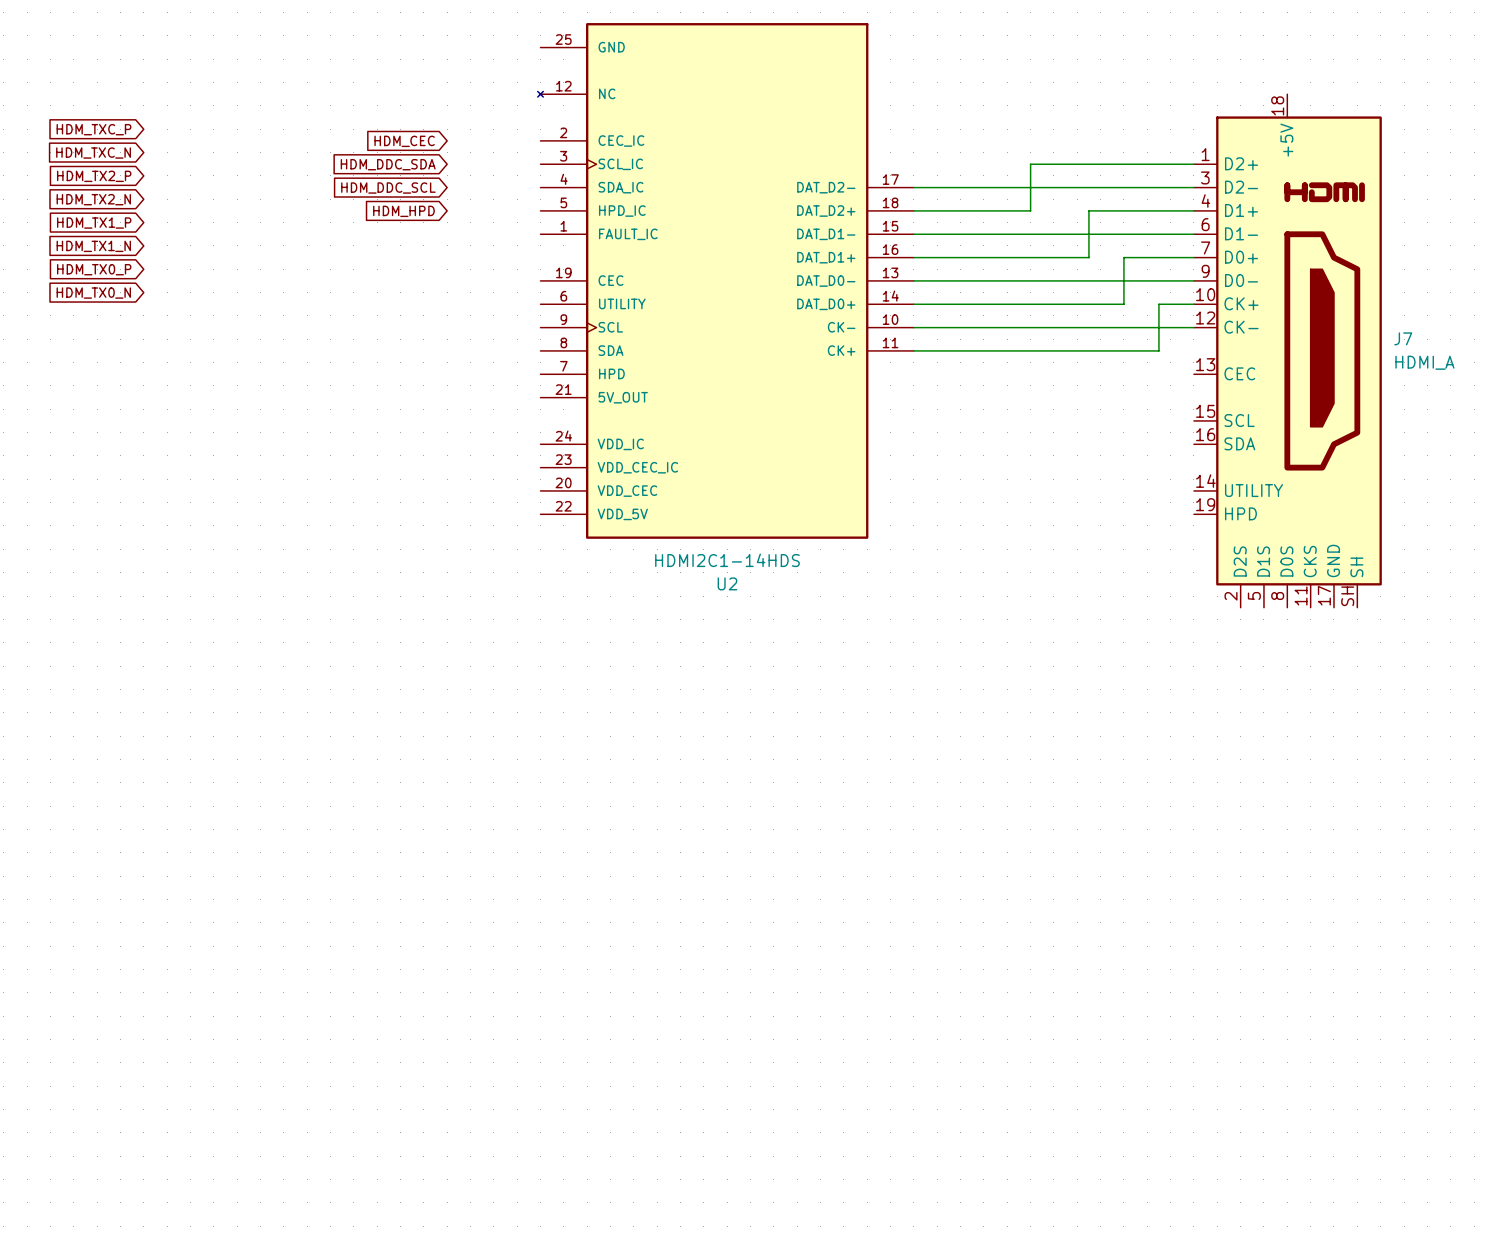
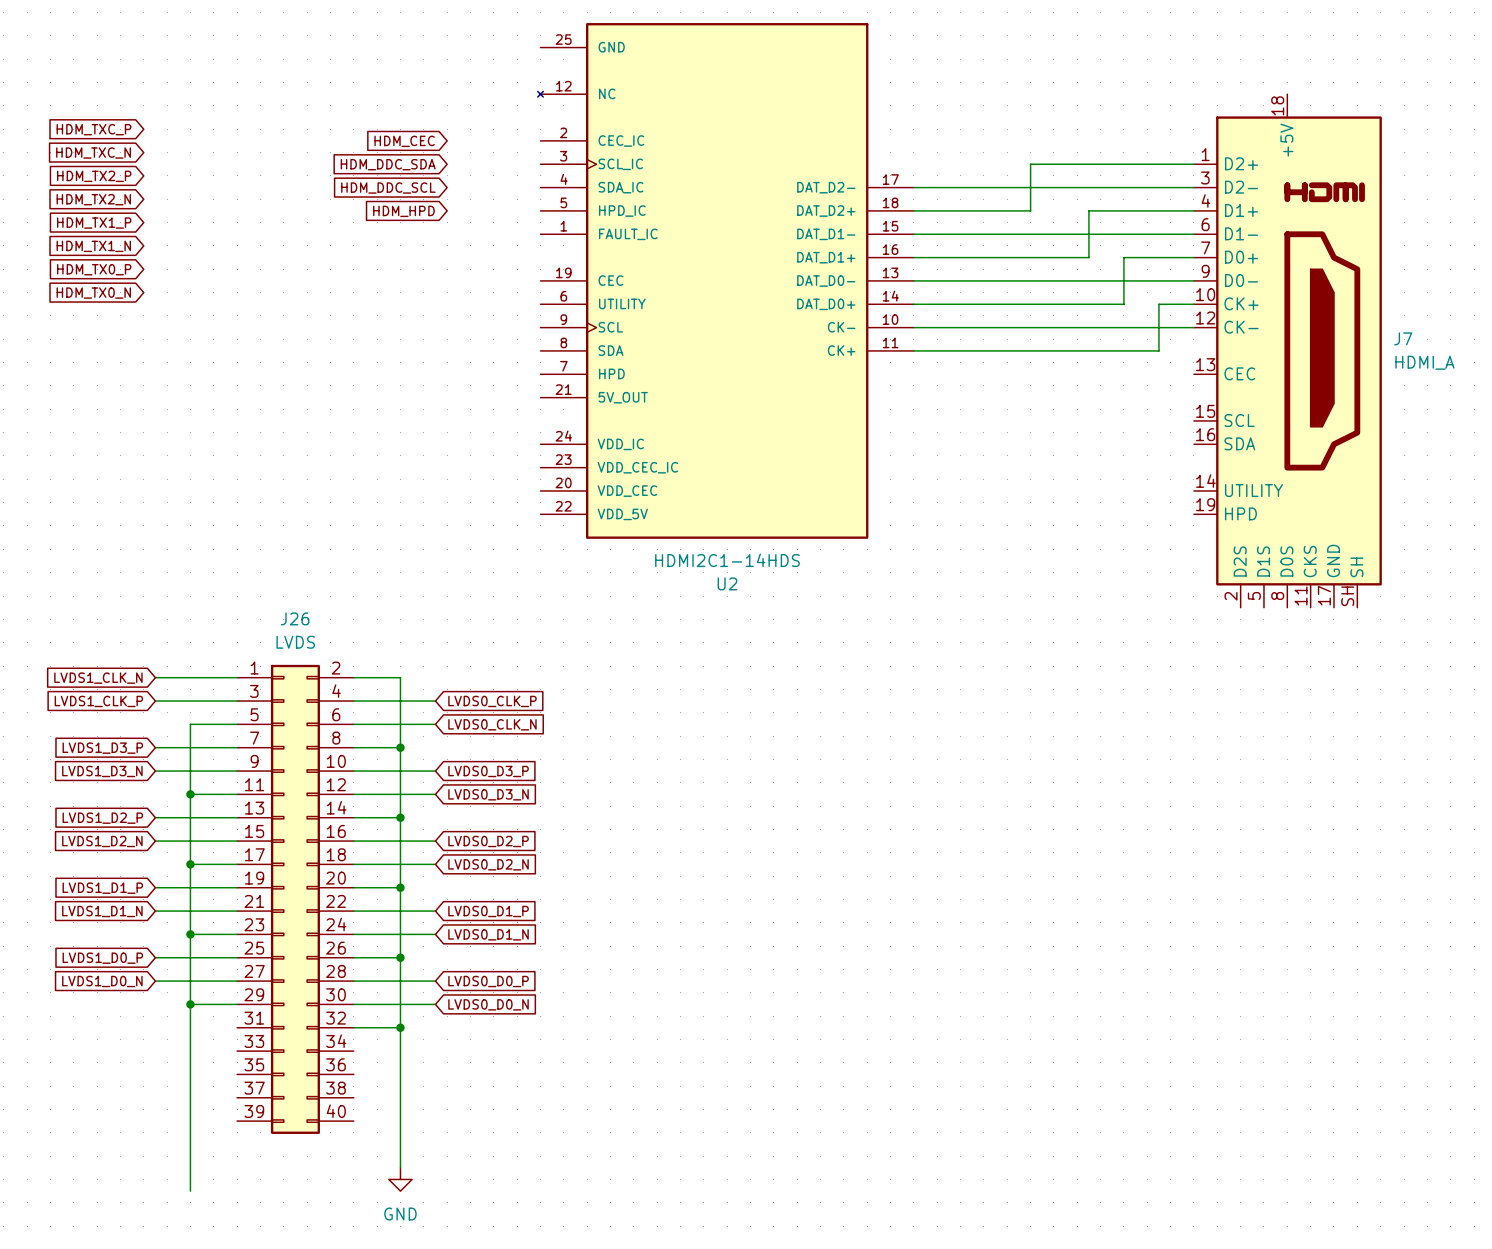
wire: none -> (155, 677) (237, 677)
wire: none -> (353, 677) (400, 677) (400, 1167)
global label: none -> LVDS1_CLK_N (98, 678)
global label: none -> LVDS1_CLK_P (98, 701)
wire: none -> (155, 701) (237, 701)
wire: none -> (353, 701) (435, 701)
global label: none -> LVDS0_CLK_P (492, 701)
wire: none -> (237, 724) (190, 724) (190, 1191)
wire: none -> (353, 724) (435, 724)
global label: none -> LVDS0_CLK_N (492, 724)
wire: none -> (155, 747) (237, 747)
wire: none -> (353, 747) (400, 747)
junction: none -> (400, 747)
global label: none -> LVDS1_D3_P (102, 748)
global label: none -> LVDS1_D3_N (102, 771)
wire: none -> (155, 771) (237, 771)
wire: none -> (353, 771) (435, 771)
global label: none -> LVDS0_D3_P (488, 771)
wire: none -> (190, 794) (237, 794)
junction: none -> (190, 794)
wire: none -> (353, 794) (435, 794)
global label: none -> LVDS0_D3_N (488, 794)
wire: none -> (155, 817) (237, 817)
wire: none -> (353, 817) (400, 817)
junction: none -> (400, 817)
global label: none -> LVDS1_D2_P (102, 818)
global label: none -> LVDS1_D2_N (102, 841)
wire: none -> (155, 841) (237, 841)
wire: none -> (353, 841) (435, 841)
global label: none -> LVDS0_D2_P (488, 841)
wire: none -> (190, 864) (237, 864)
junction: none -> (190, 864)
wire: none -> (353, 864) (435, 864)
global label: none -> LVDS0_D2_N (488, 864)
wire: none -> (155, 887) (237, 887)
wire: none -> (353, 887) (400, 887)
junction: none -> (400, 887)
global label: none -> LVDS1_D1_P (102, 888)
J26: none -> LVDS (295, 899)
global label: none -> LVDS1_D1_N (102, 911)
wire: none -> (155, 911) (237, 911)
wire: none -> (353, 911) (435, 911)
global label: none -> LVDS0_D1_P (488, 911)
wire: none -> (190, 934) (237, 934)
junction: none -> (190, 934)
wire: none -> (353, 934) (435, 934)
global label: none -> LVDS0_D1_N (488, 934)
wire: none -> (155, 957) (237, 957)
wire: none -> (353, 957) (400, 957)
junction: none -> (400, 957)
global label: none -> LVDS1_D0_P (102, 958)
global label: none -> LVDS1_D0_N (102, 981)
wire: none -> (155, 981) (237, 981)
wire: none -> (353, 981) (435, 981)
global label: none -> LVDS0_D0_P (488, 981)
wire: none -> (190, 1004) (237, 1004)
junction: none -> (190, 1004)
wire: none -> (353, 1004) (435, 1004)
global label: none -> LVDS0_D0_N (488, 1004)
wire: none -> (353, 1027) (400, 1027)
junction: none -> (400, 1027)
power symbol: none -> GND (400, 1179)

